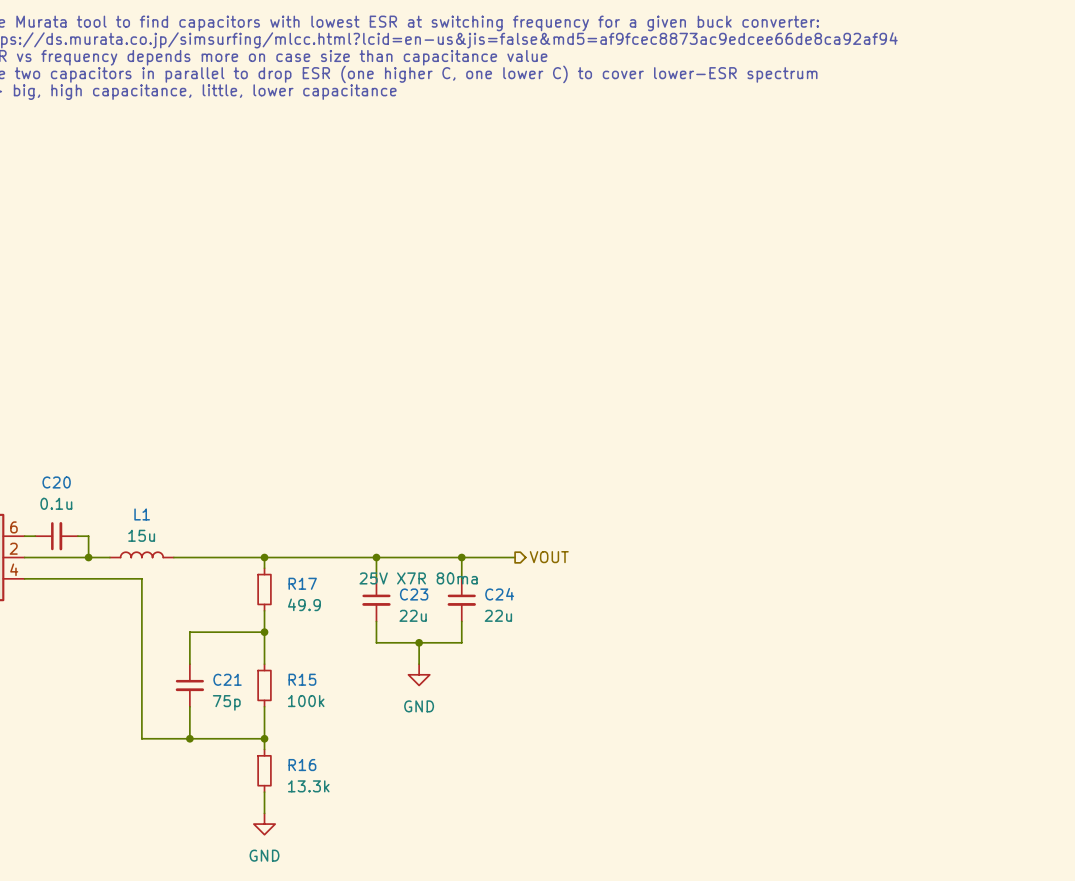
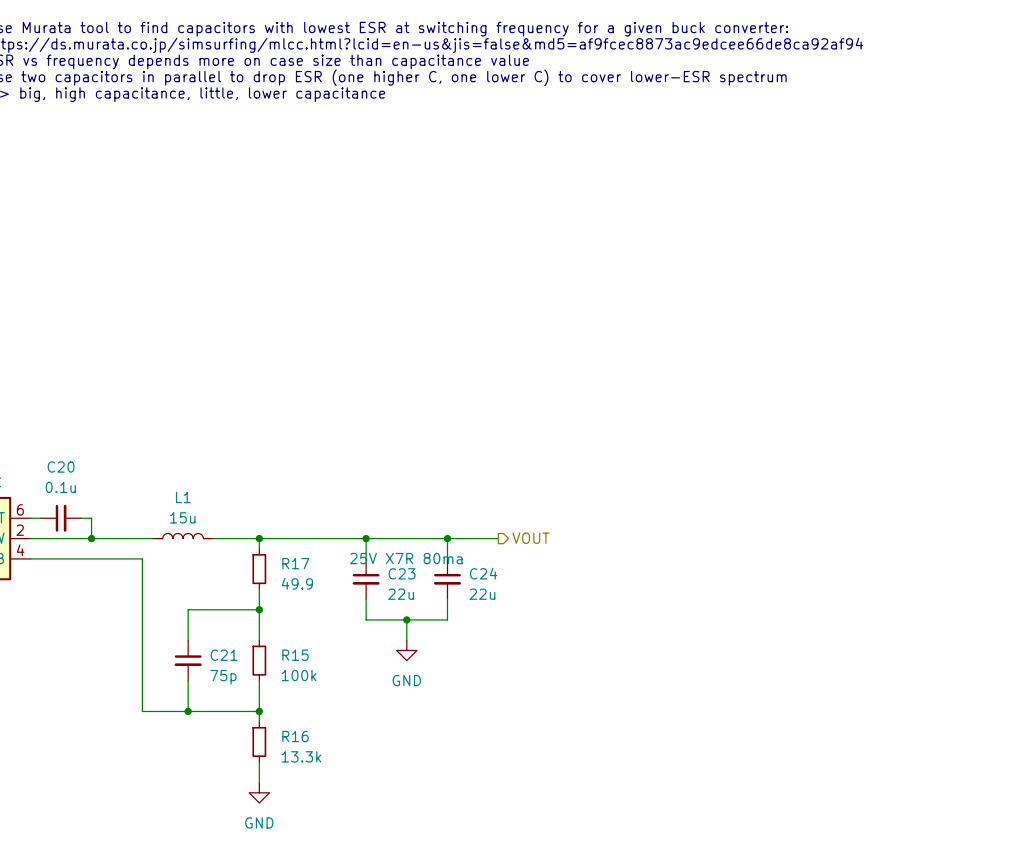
L1 position: (141, 554) -> (183, 536)
wire: (173, 557) (216, 557) -> (111, 538) (152, 538)

